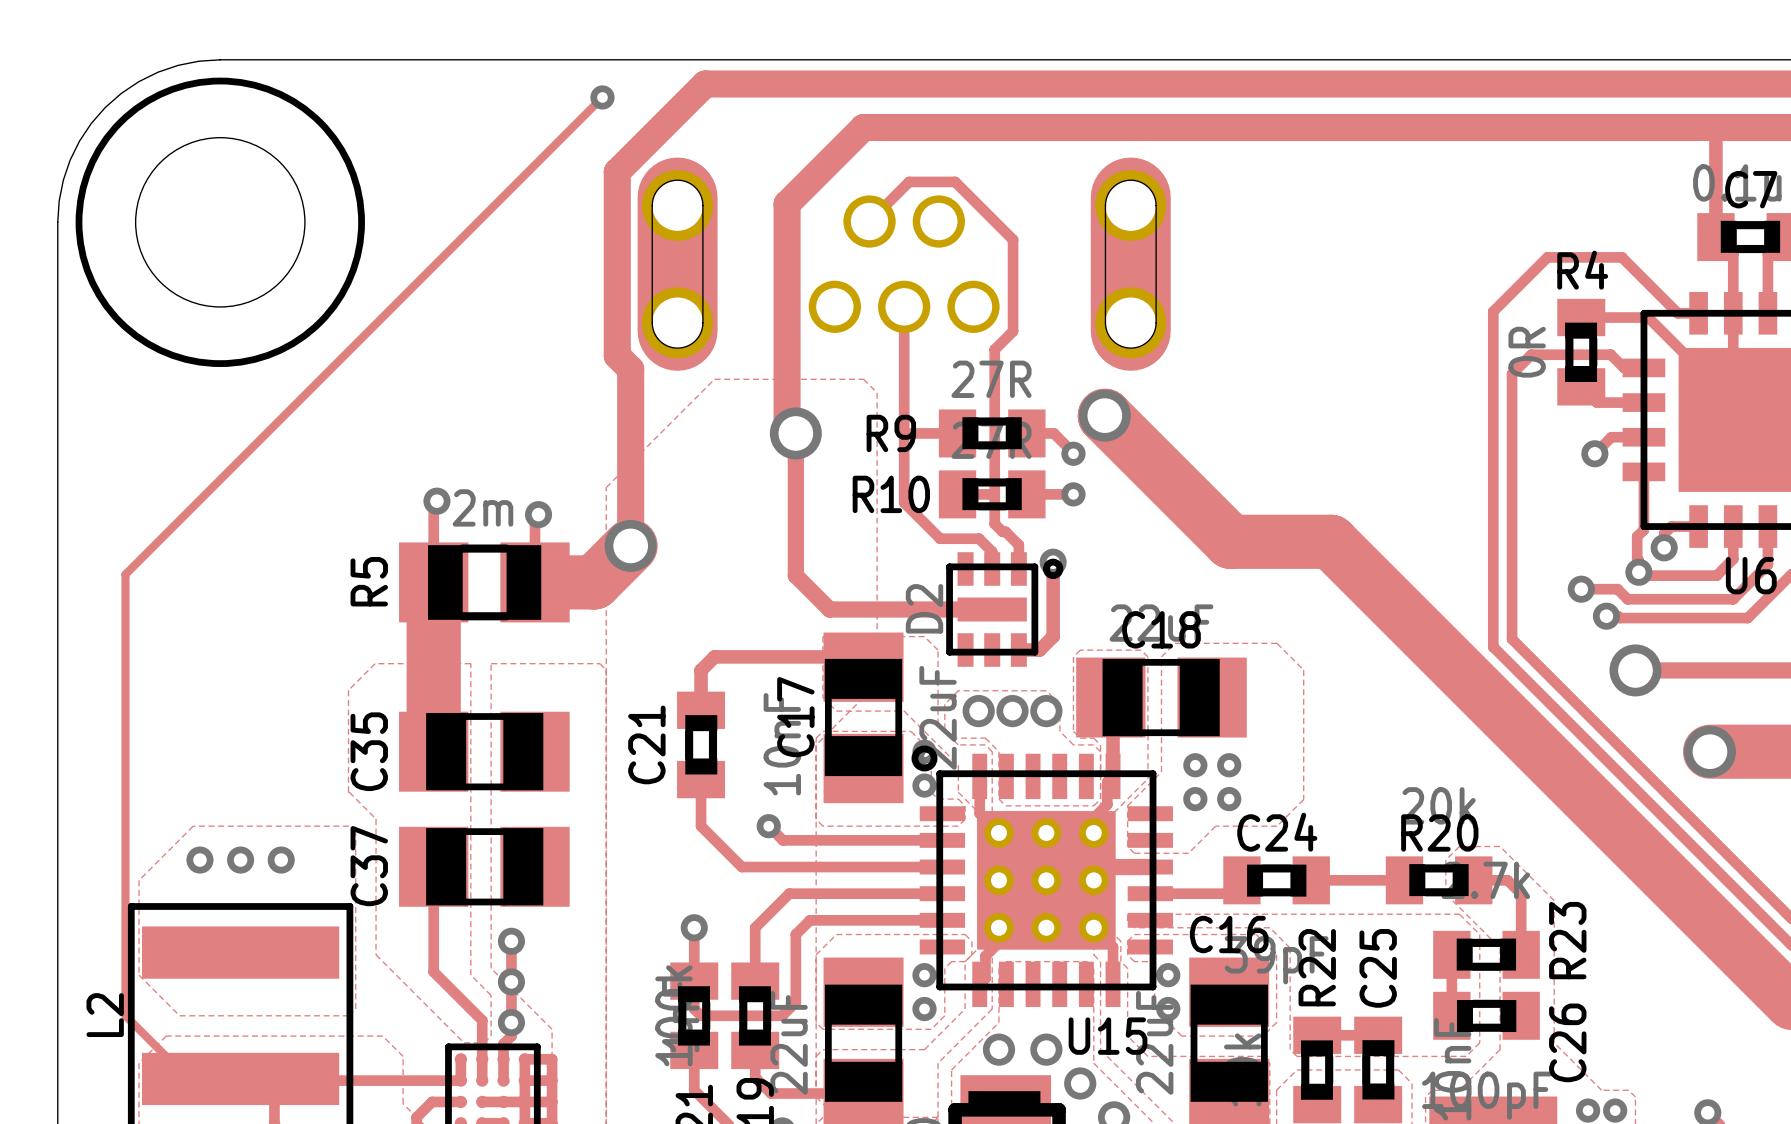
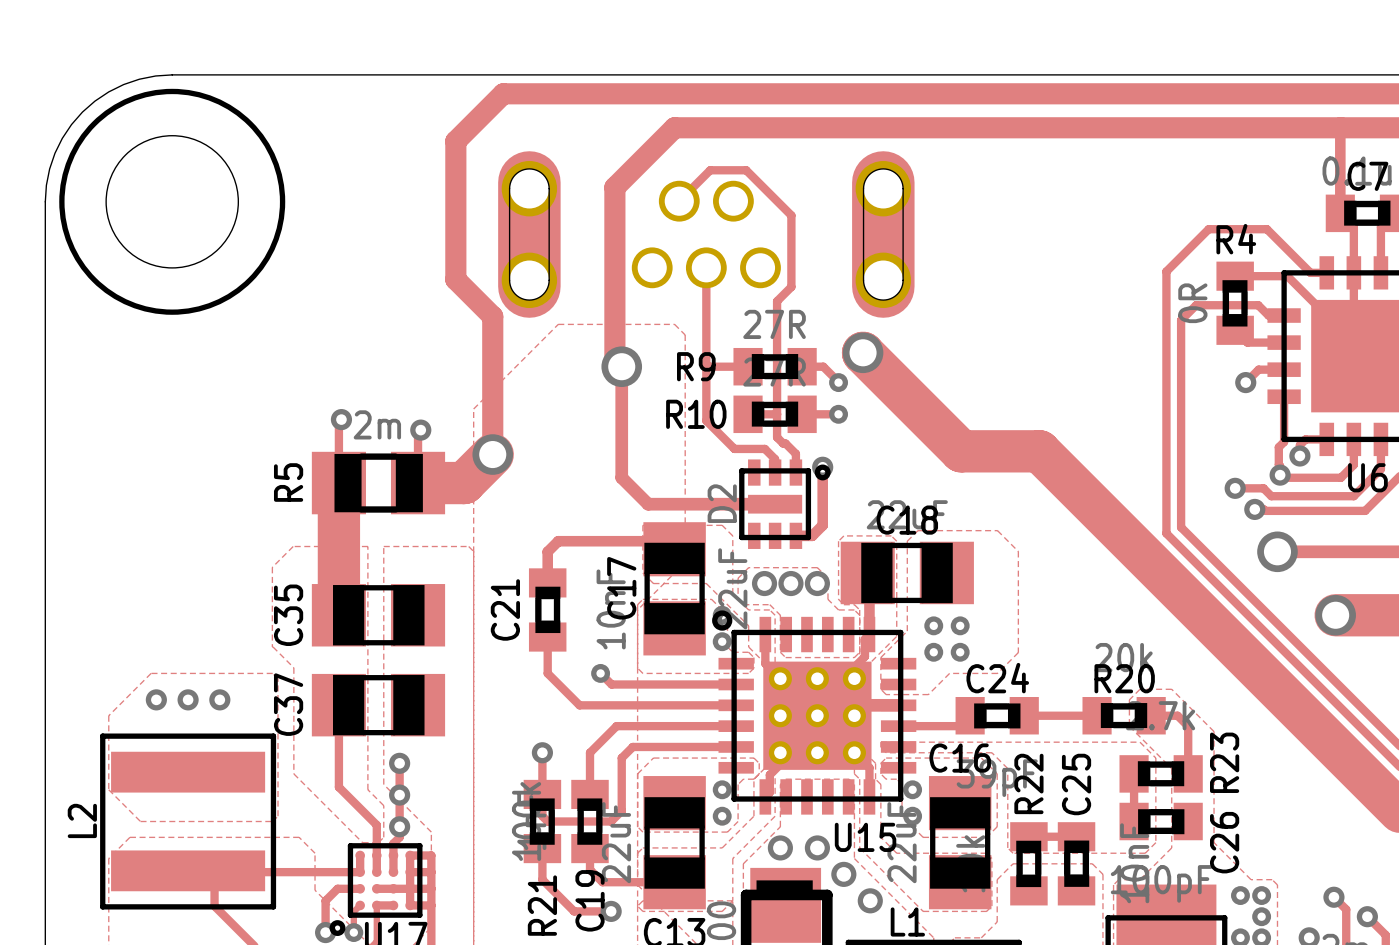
track: (705, 84) (617, 171) (617, 355) -> (550, 93) (503, 93) (455, 141) (455, 279) (482, 306)
track: (602, 97) (125, 574) (125, 1015) (188, 1078) -> none
via: (602, 97) -> none

